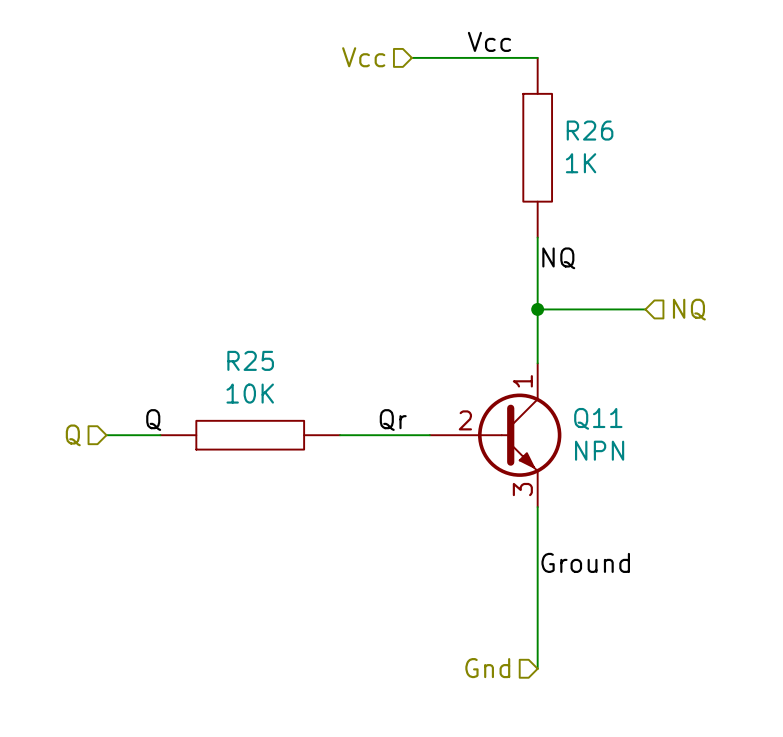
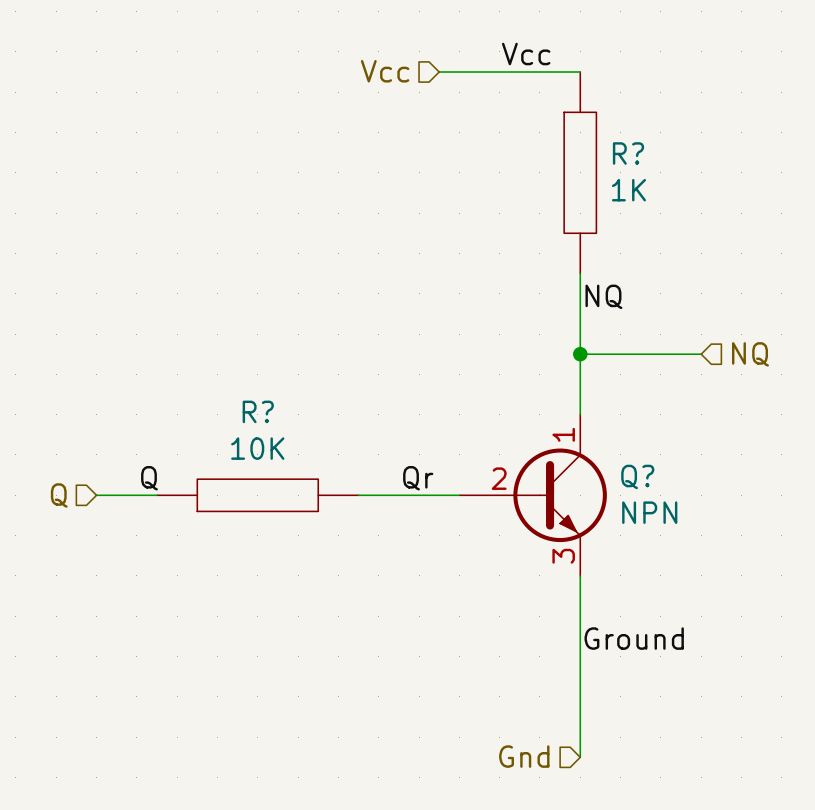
R26 name: R26 (590, 130) -> R? (628, 153)
R25 name: R25 (250, 360) -> R? (258, 411)
Q11 name: Q11 (598, 418) -> Q? (637, 476)

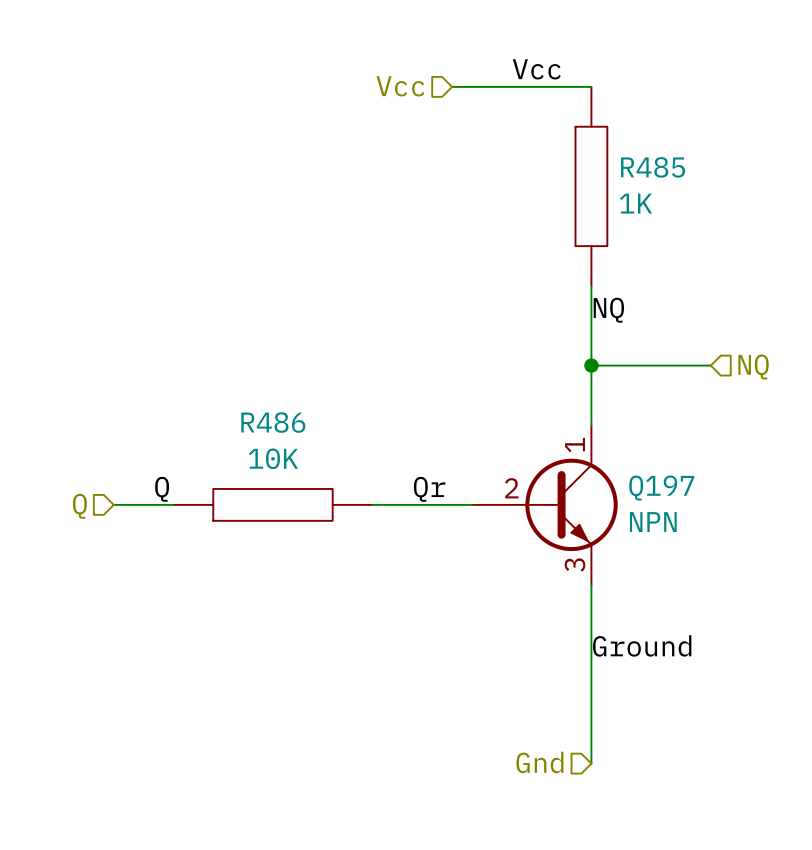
R? name: R? (628, 153) -> R485 (653, 167)
R? name: R? (258, 411) -> R486 (273, 422)
Q? name: Q? (637, 476) -> Q197 (661, 488)

